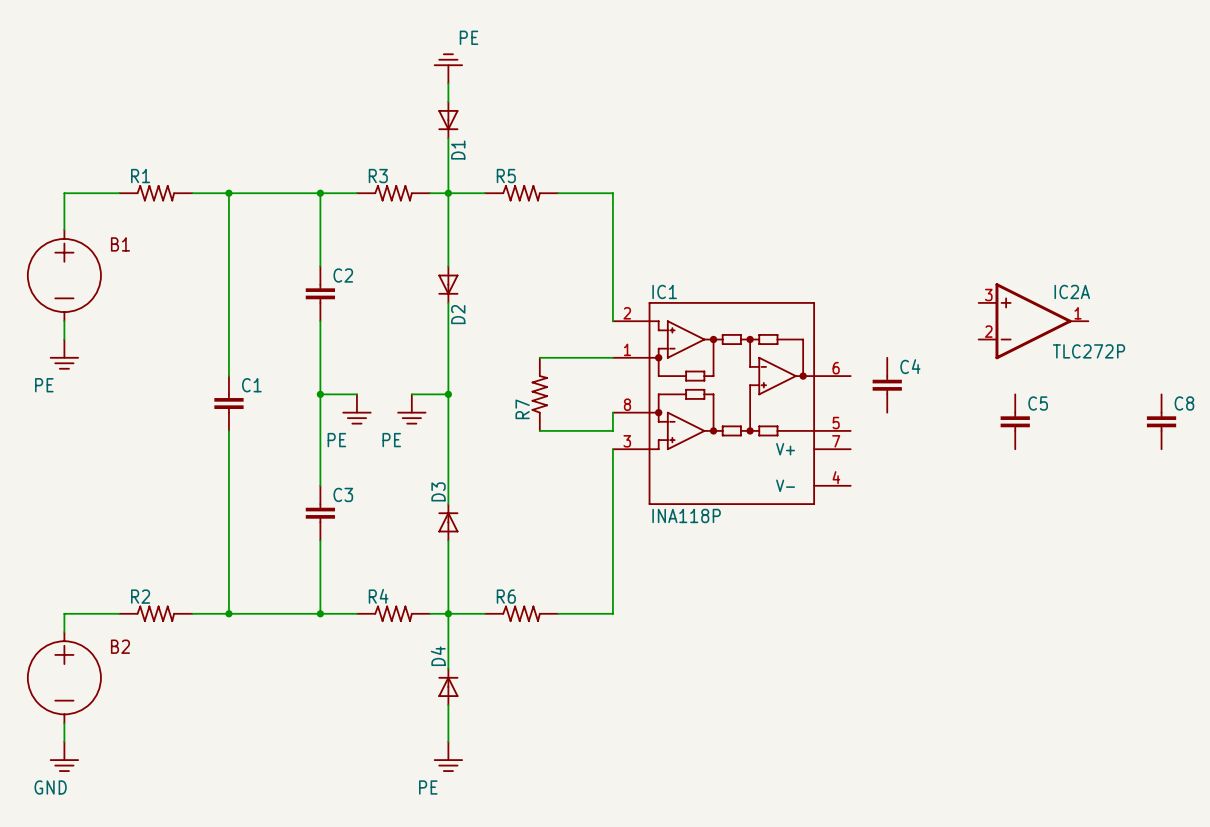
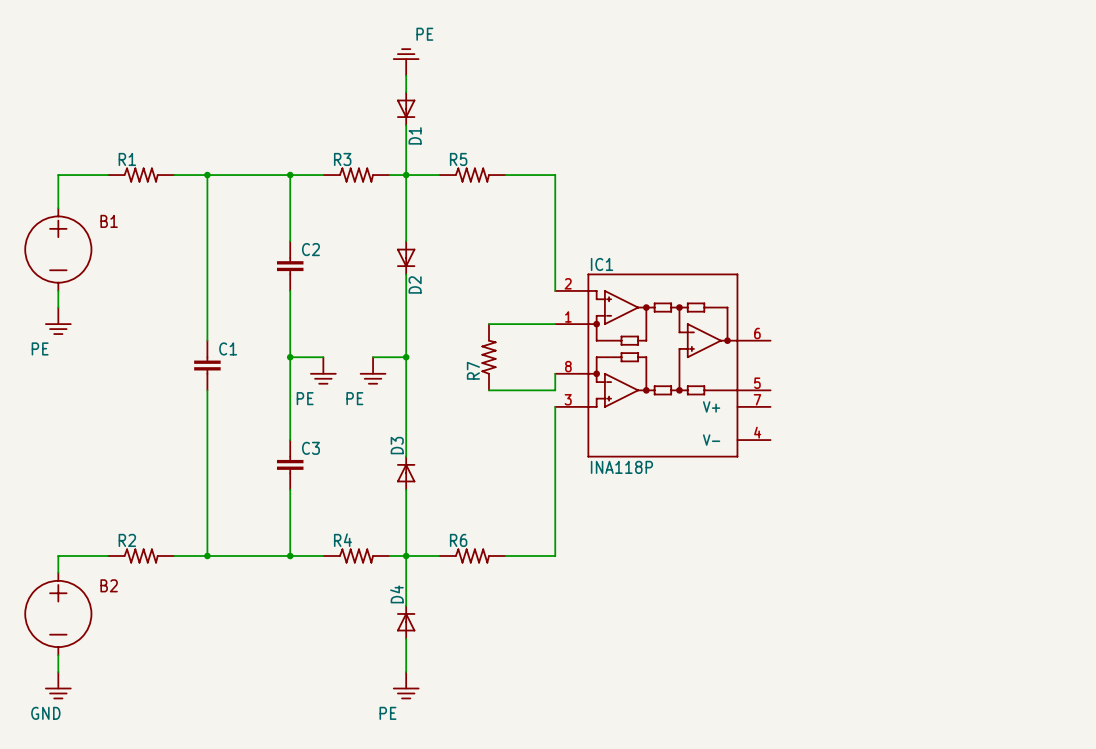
IC2A: TLC272P (1033, 321) -> none
C4: (887, 385) -> none
C5: (1015, 421) -> none
C8: (1161, 421) -> none

